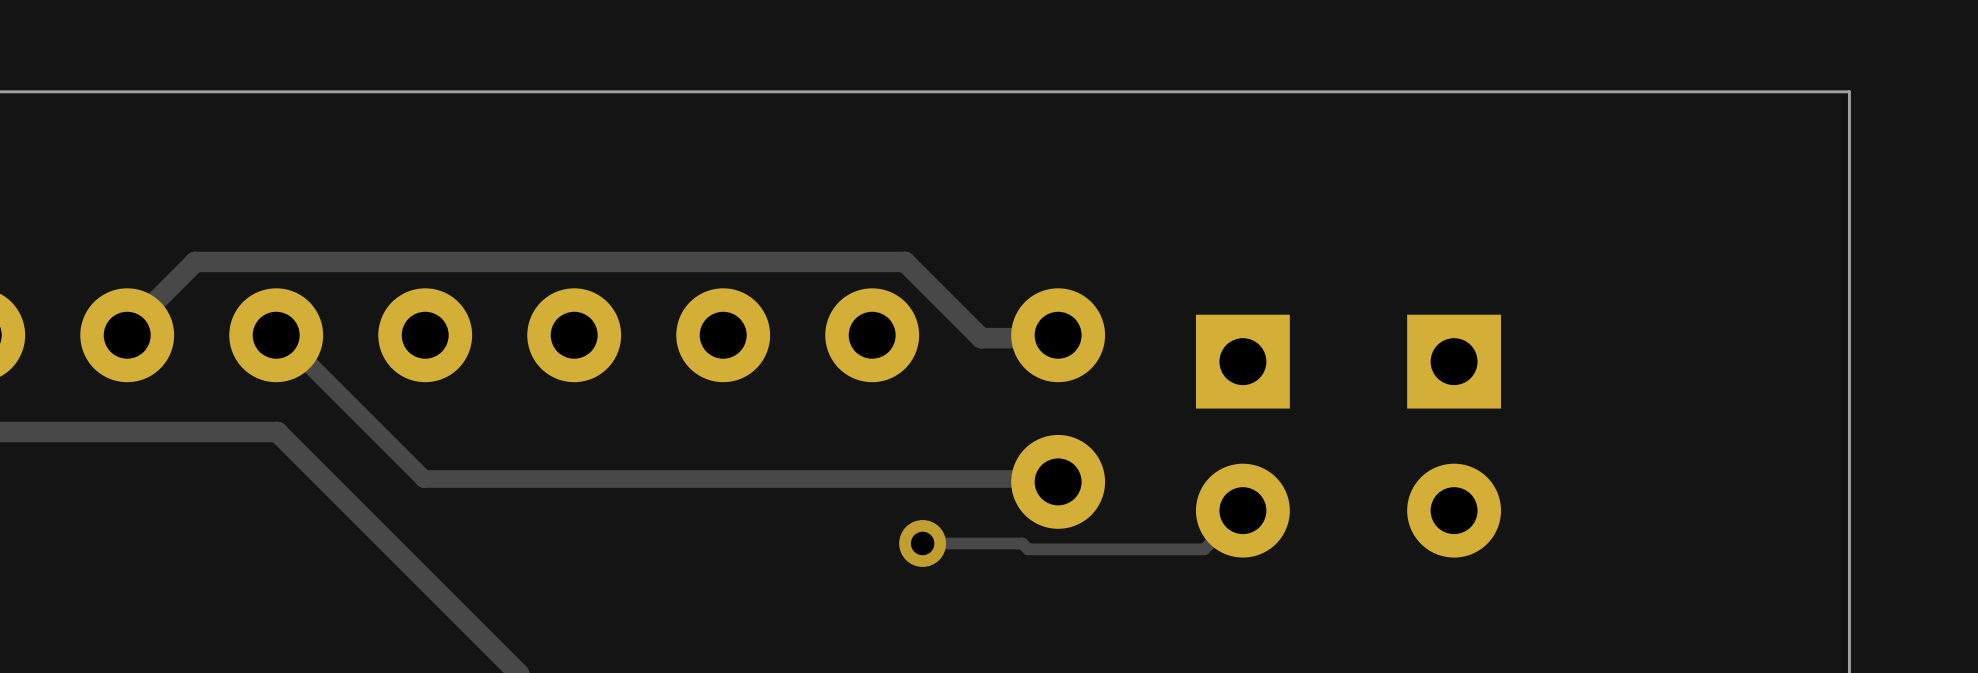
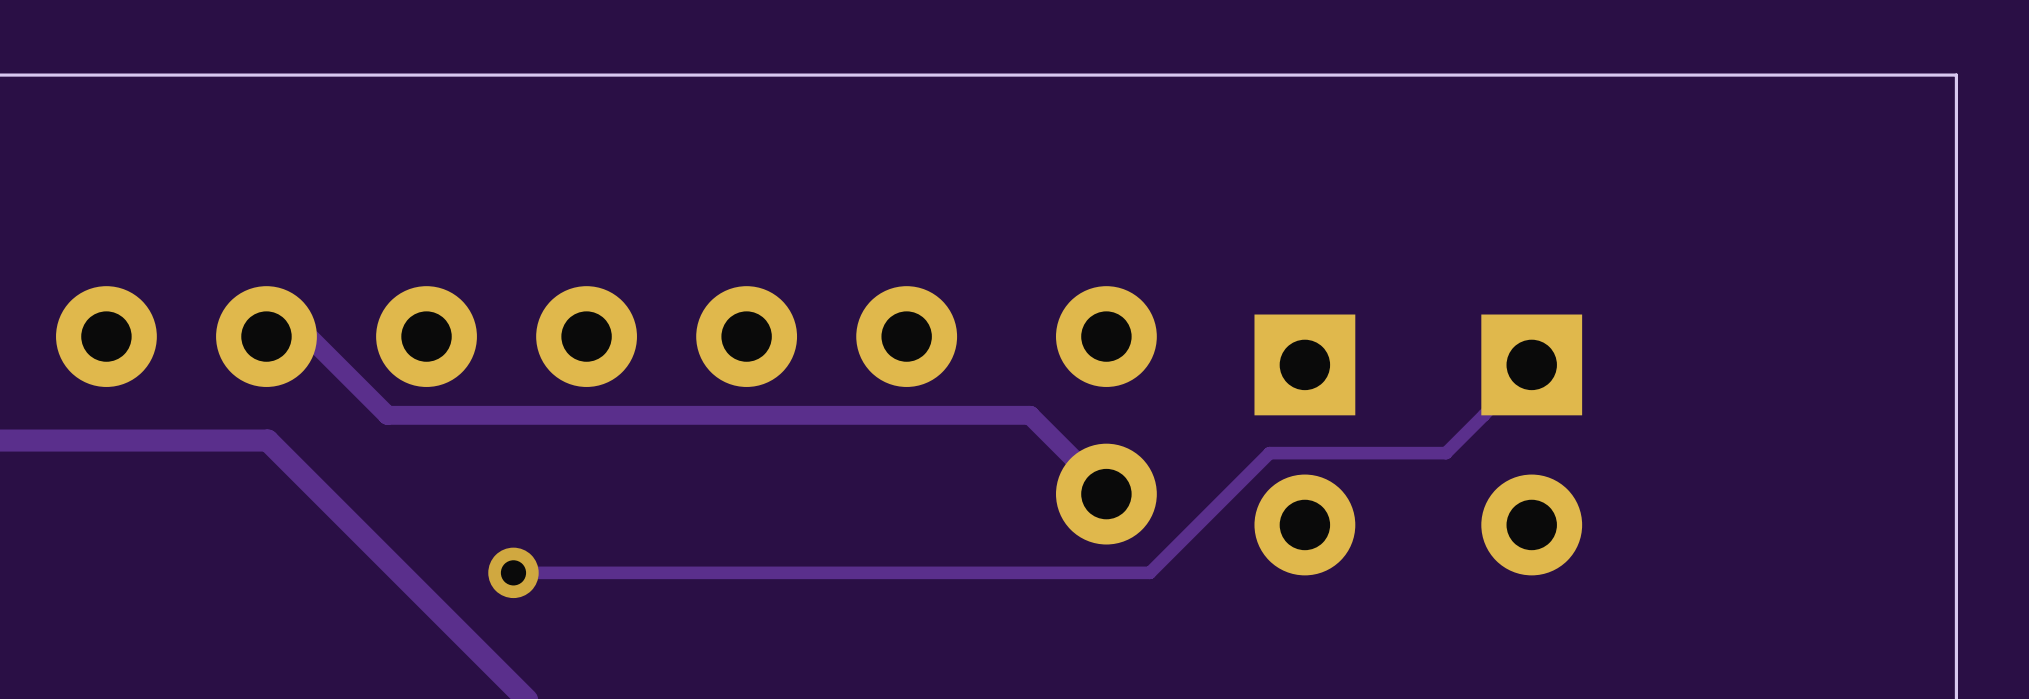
track: (277, 332) (424, 478) (1016, 478) (1058, 481) -> (267, 333) (305, 333) (387, 415) (1030, 415) (1106, 494)
track: (127, 335) (154, 302) (195, 261) (905, 261) (981, 338) (1057, 338) (1058, 335) -> none
track: none -> (1531, 364) (1446, 453) (1269, 453) (1149, 572) (513, 572)
track: (1242, 510) (1204, 549) (1028, 549) (1022, 543) (922, 543) -> none
via: (922, 543) -> none
via: none -> (513, 572)

